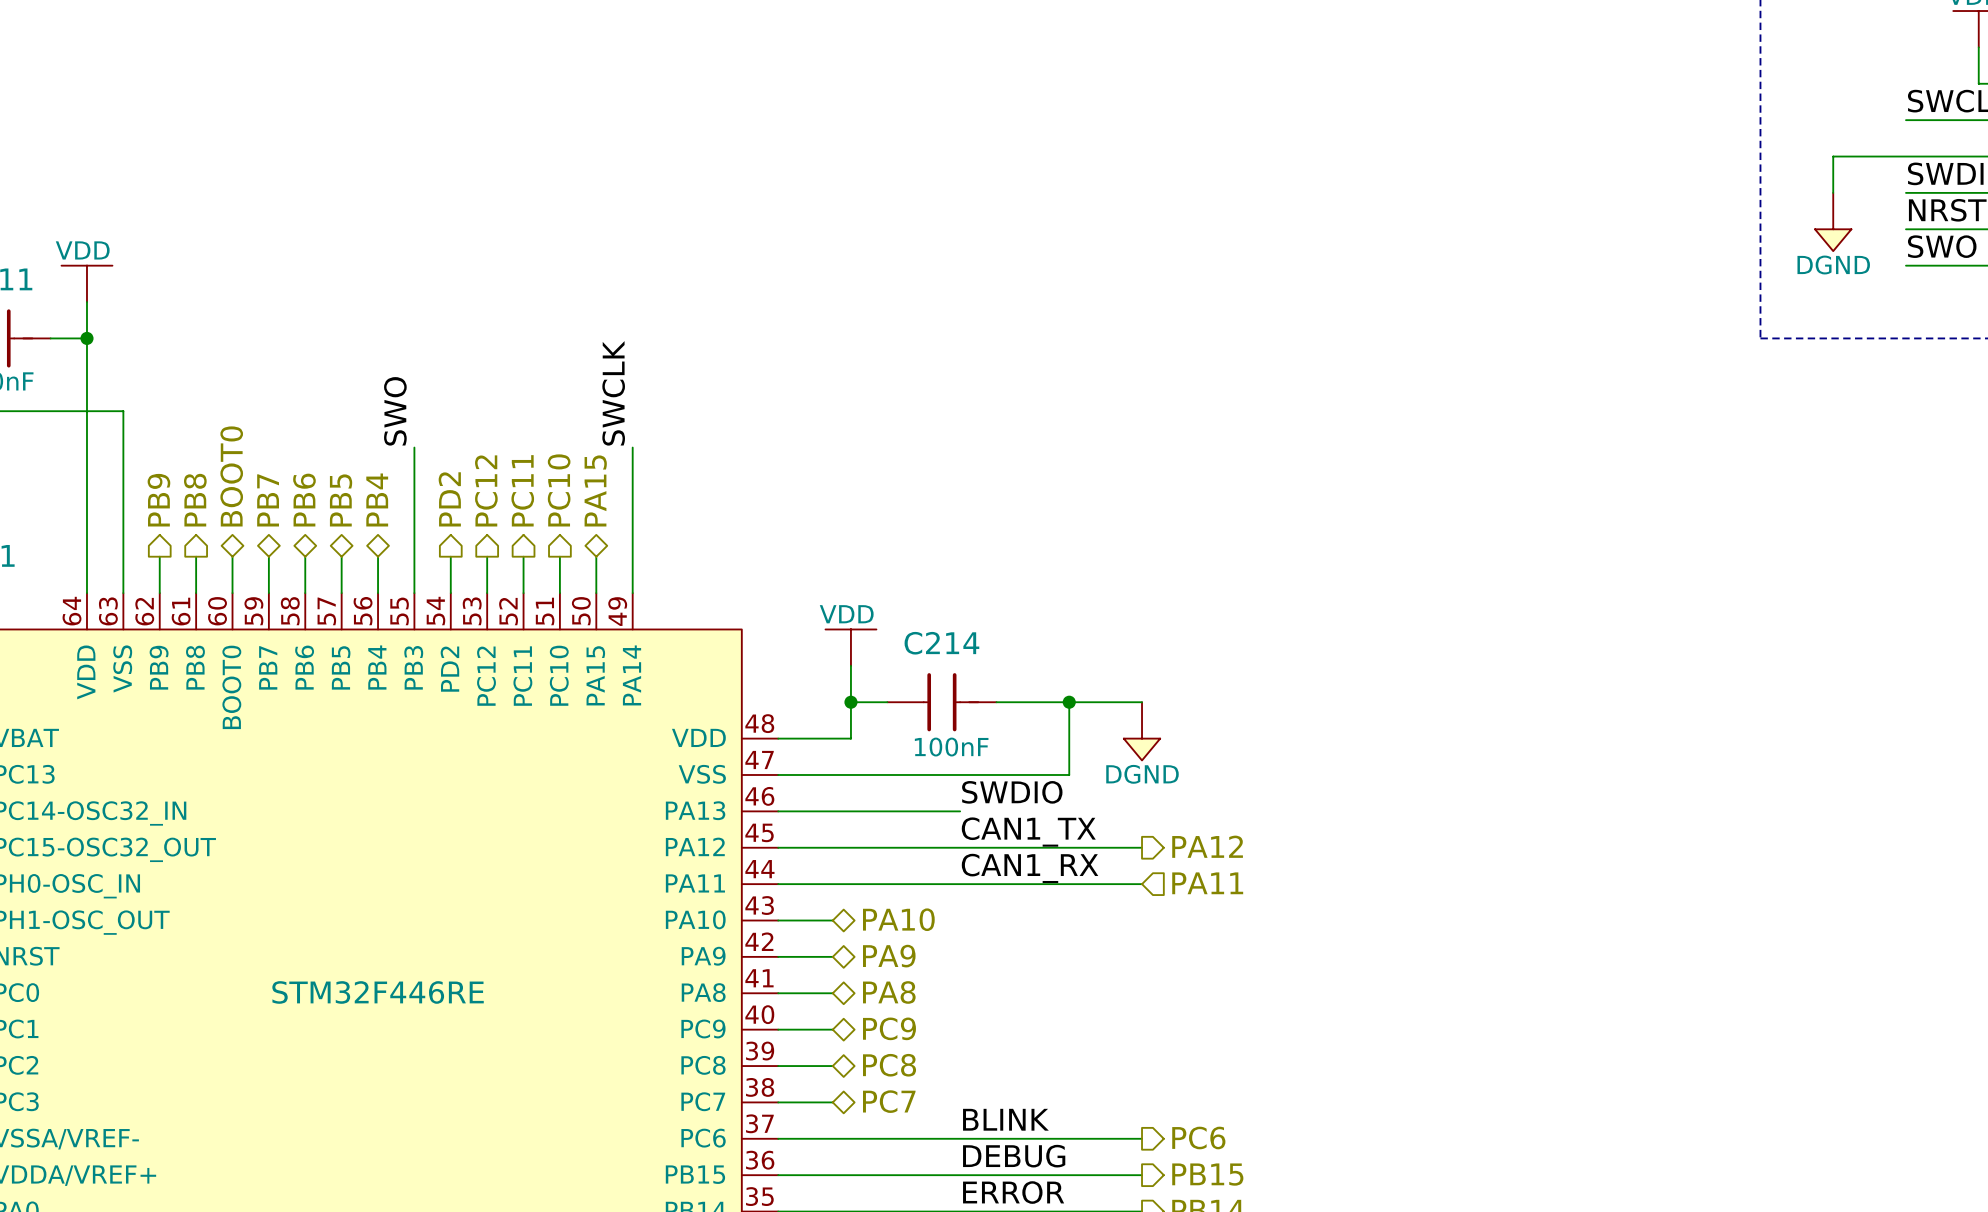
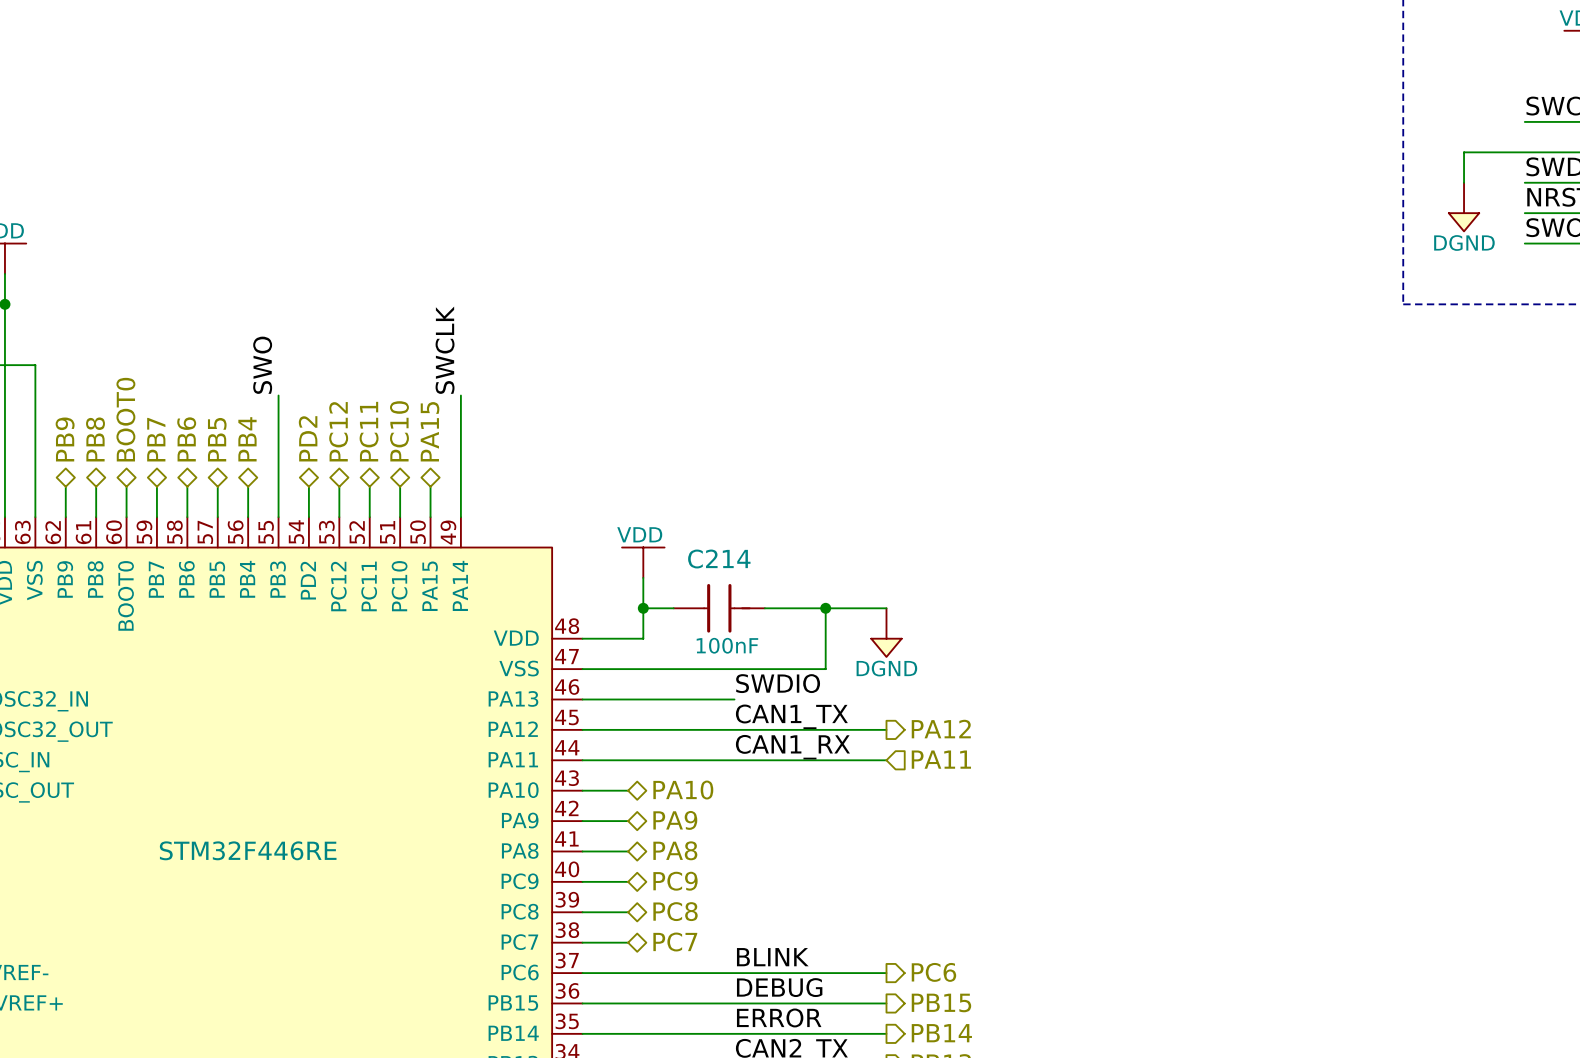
hierarchical label shape: output (486, 490) -> bidirectional (338, 431)
hierarchical label shape: output (522, 490) -> bidirectional (369, 431)
hierarchical label shape: output (559, 490) -> bidirectional (399, 431)
hierarchical label shape: output (449, 499) -> bidirectional (308, 438)
hierarchical label shape: output (158, 500) -> bidirectional (65, 439)
hierarchical label shape: output (195, 500) -> bidirectional (95, 439)

